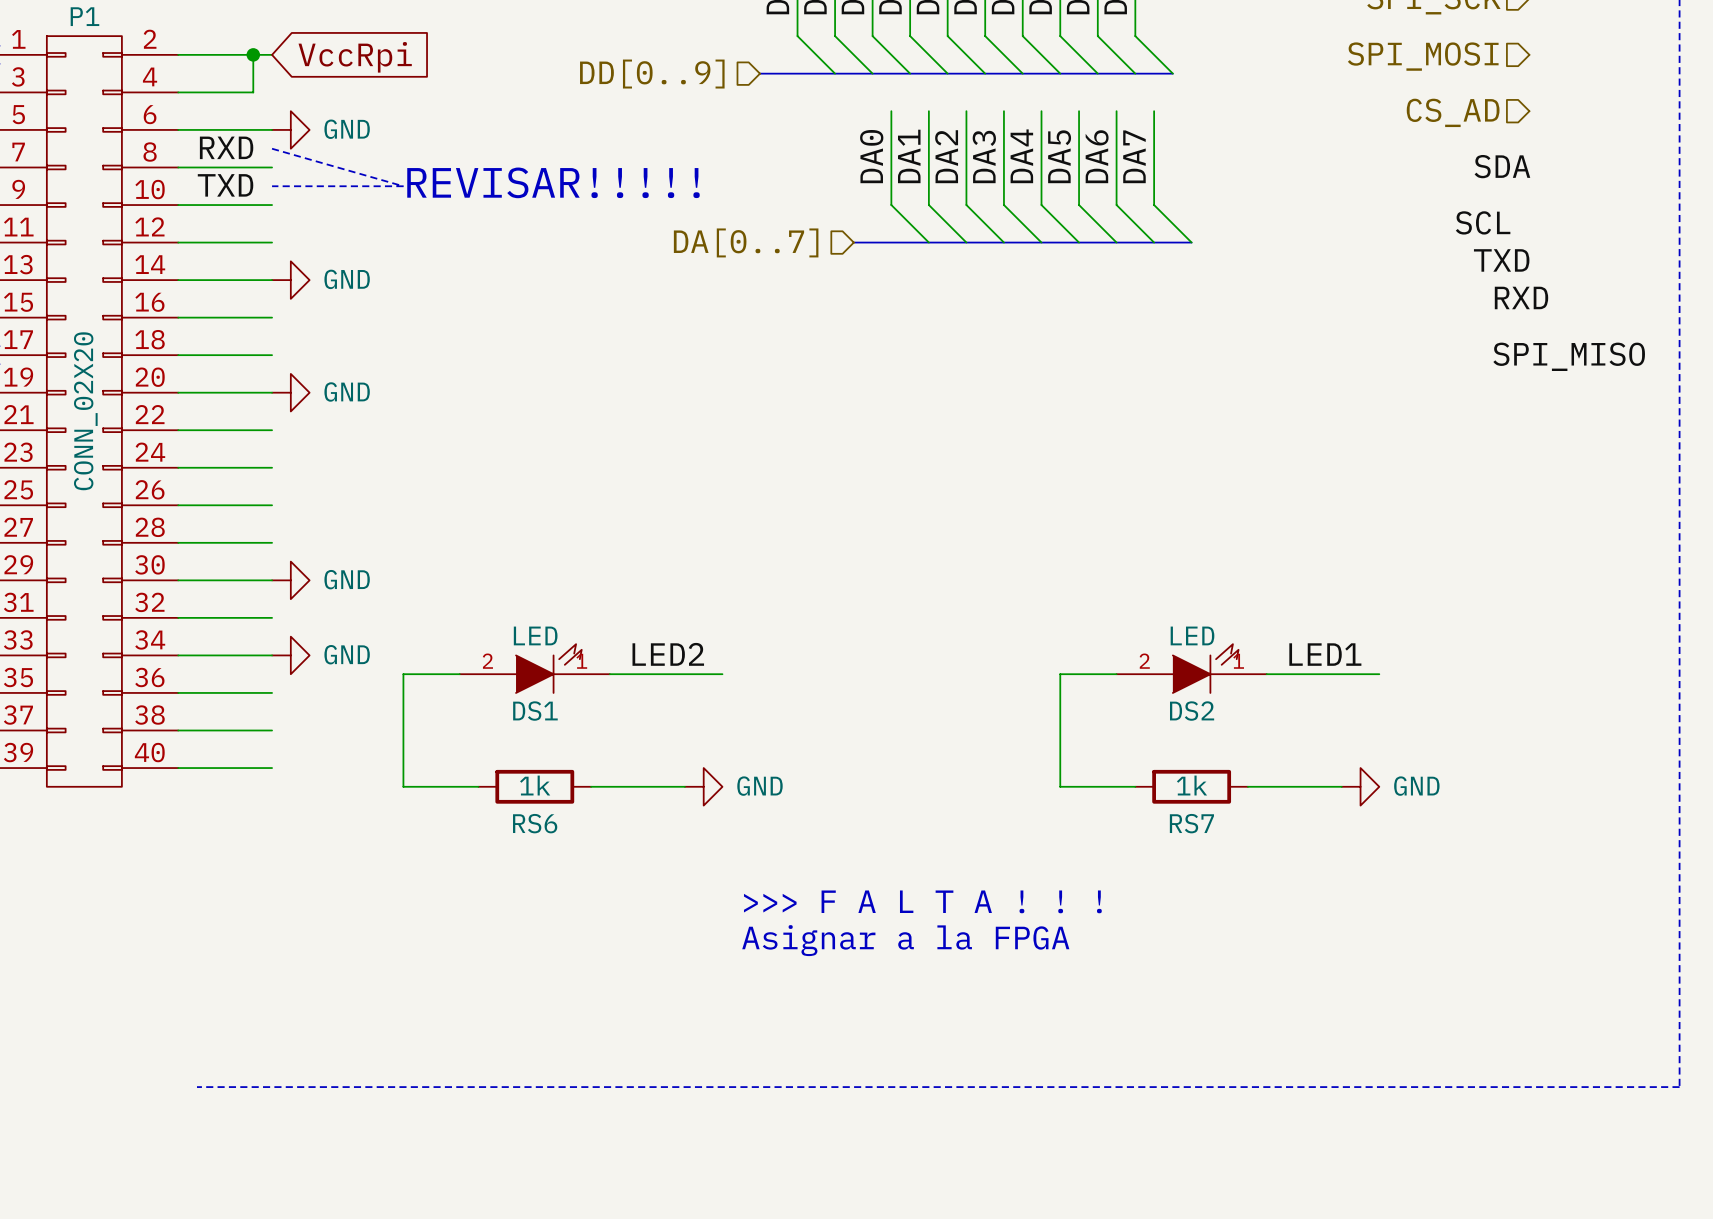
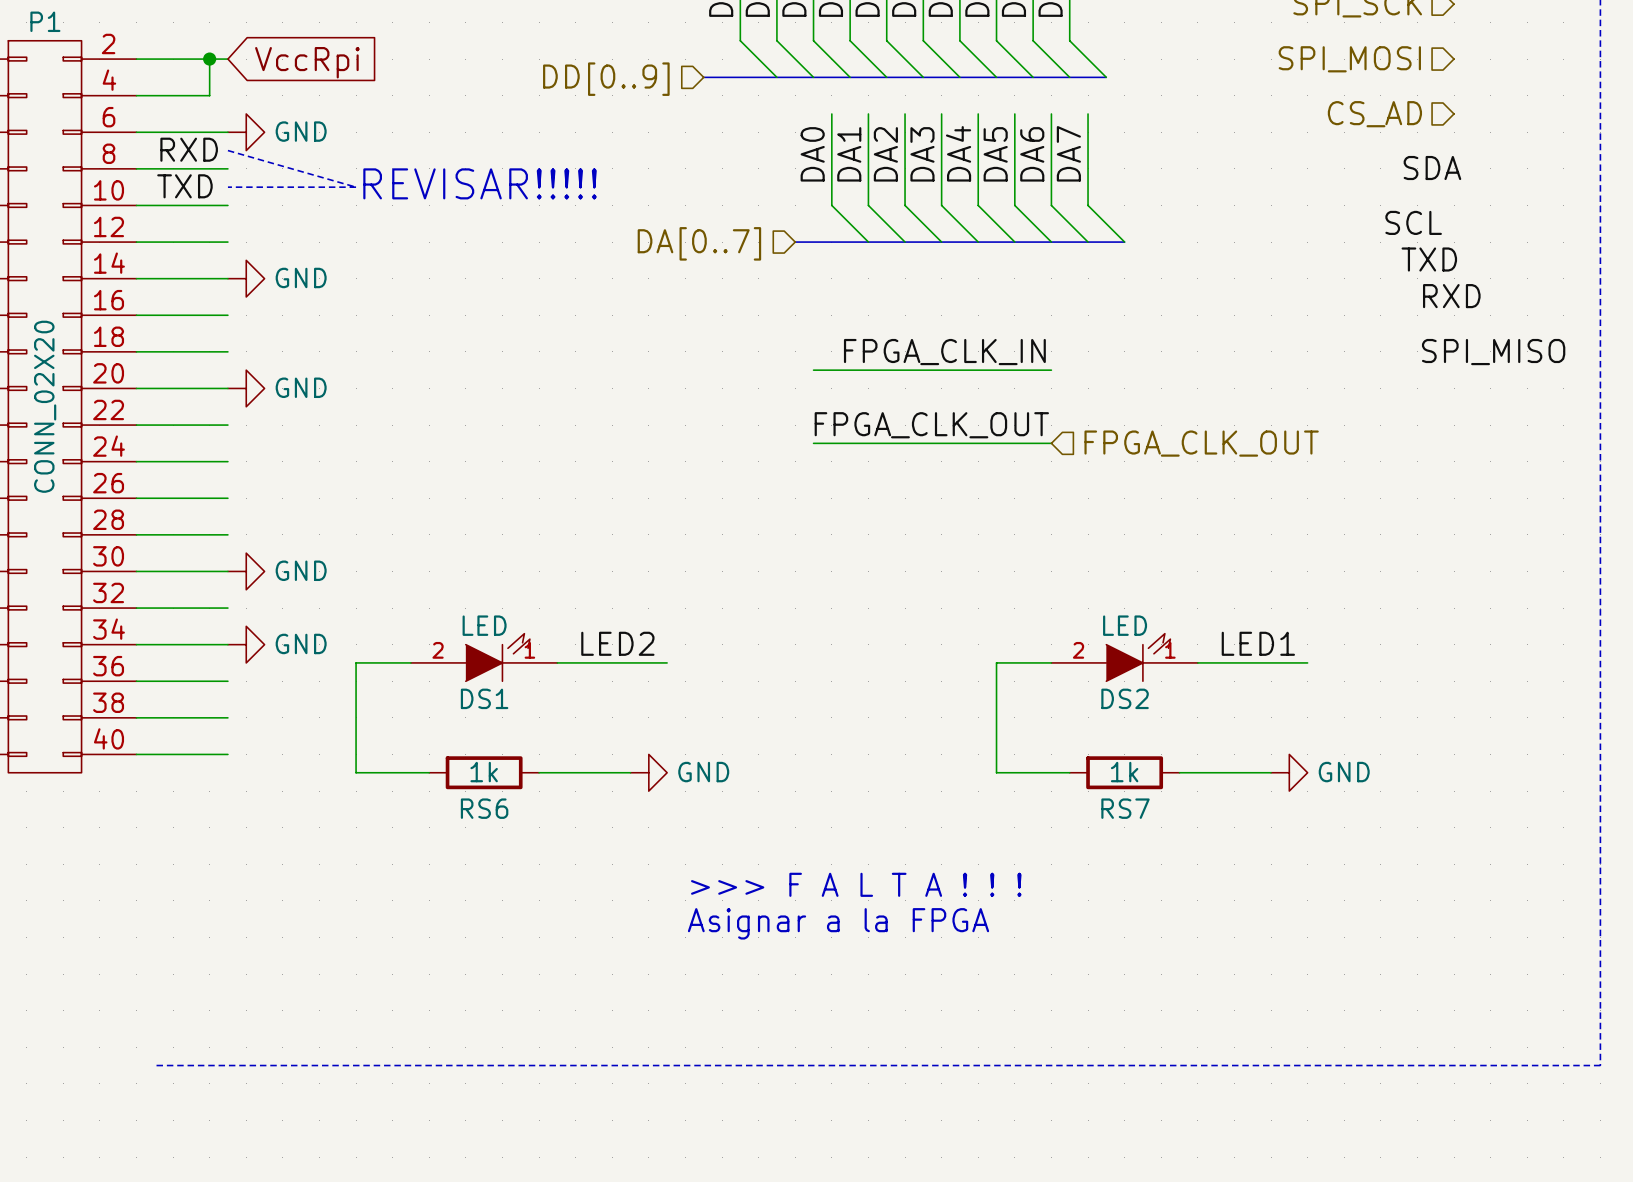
label: none -> FPGA_CLK_IN (944, 352)
wire: none -> (813, 370) (1051, 370)
label: none -> FPGA_CLK_OUT (931, 425)
wire: none -> (813, 443) (1051, 443)
hierarchical label: none -> FPGA_CLK_OUT (1201, 443)

